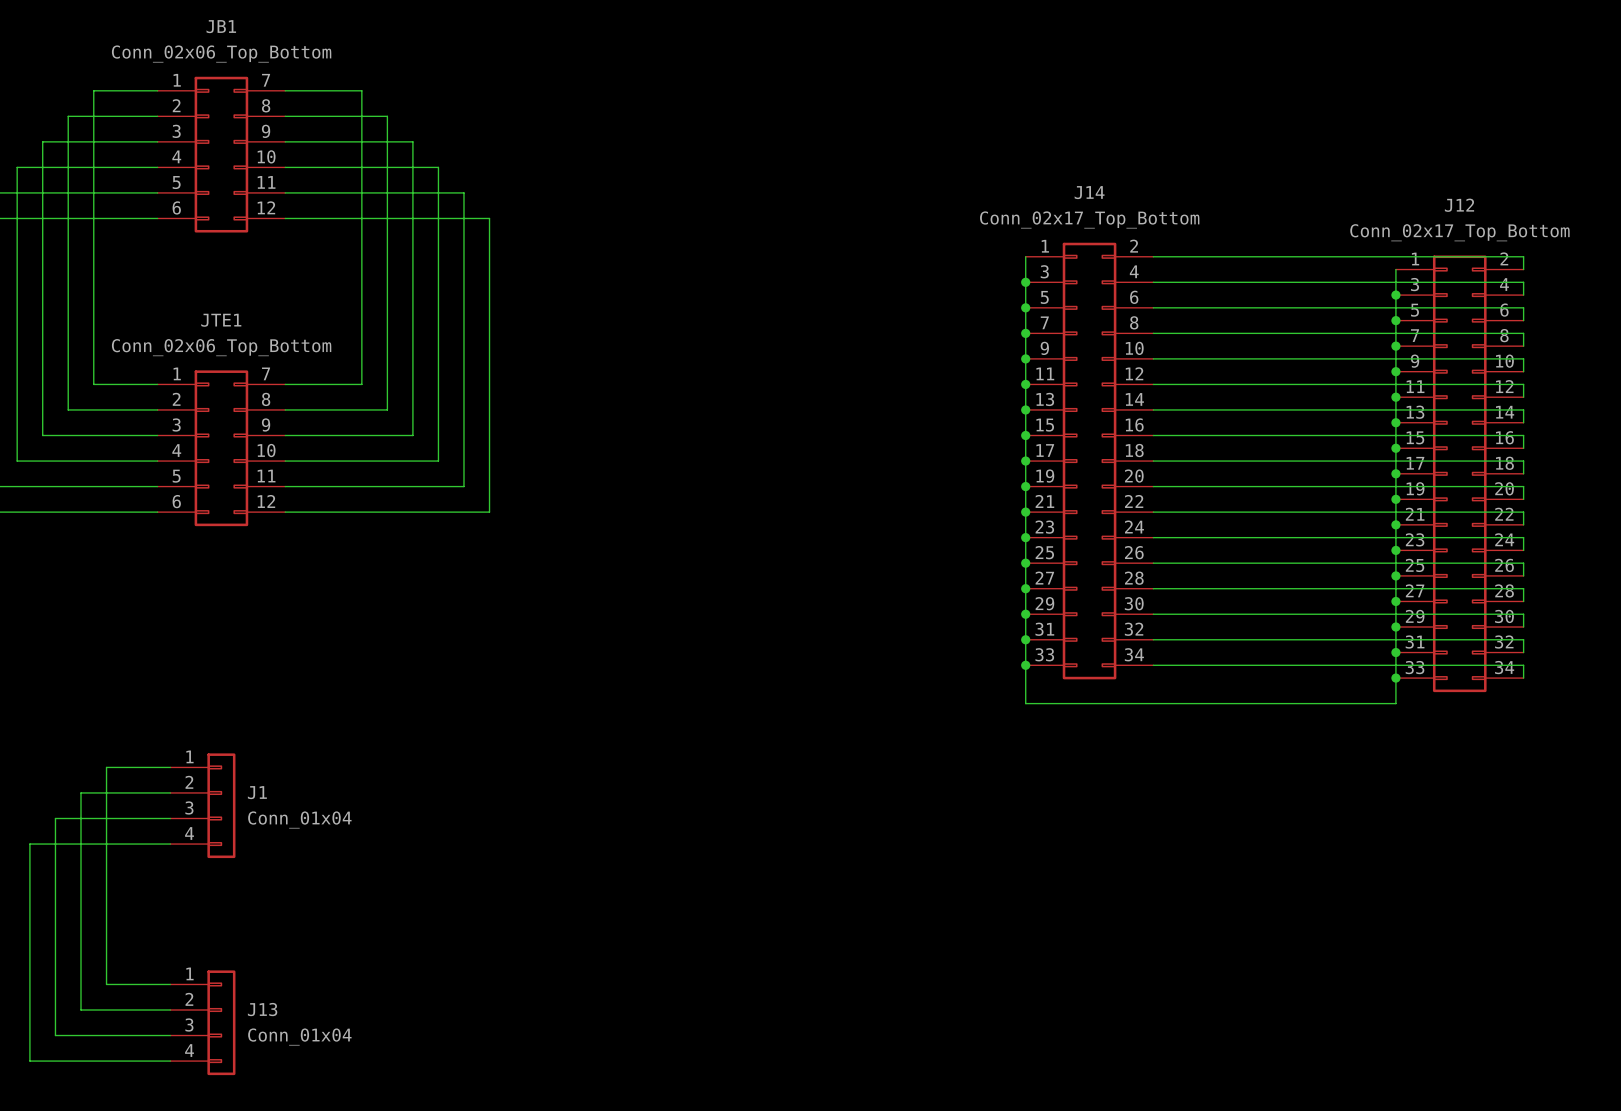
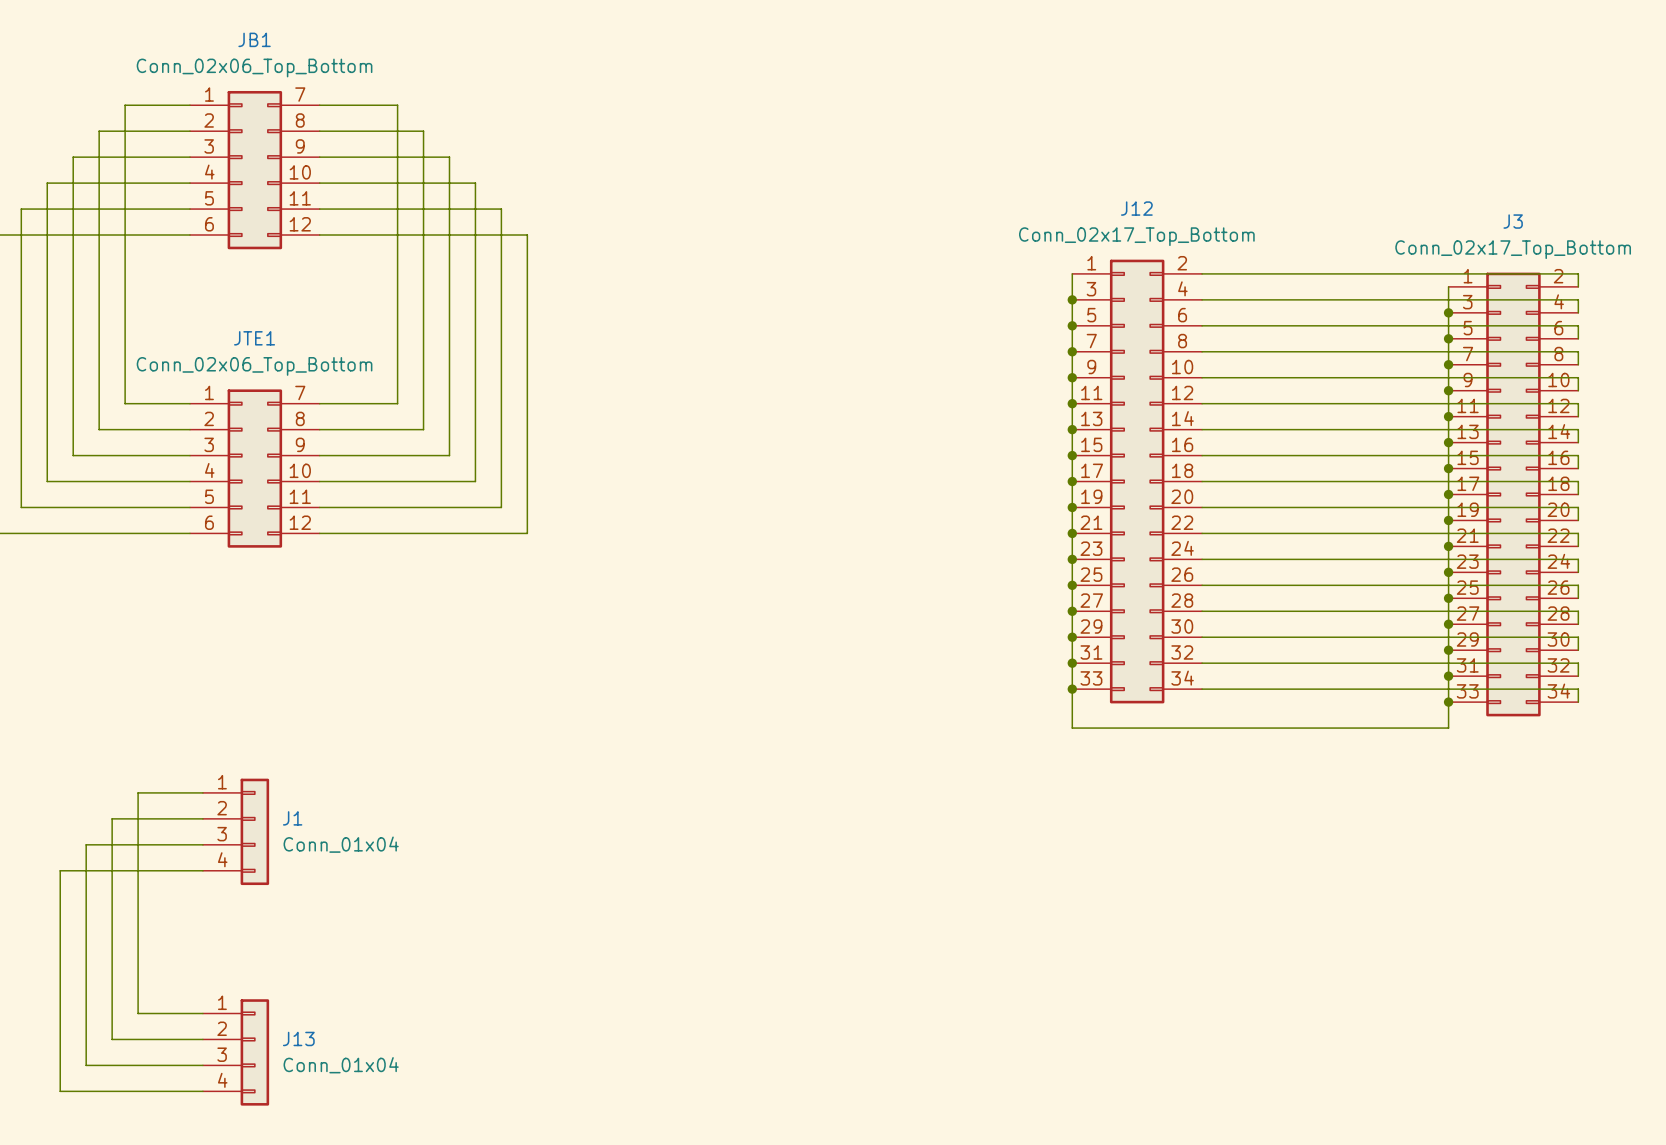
J14 name: J14 (1089, 192) -> J12 (1136, 208)
J12 name: J12 (1459, 205) -> J3 (1513, 221)

